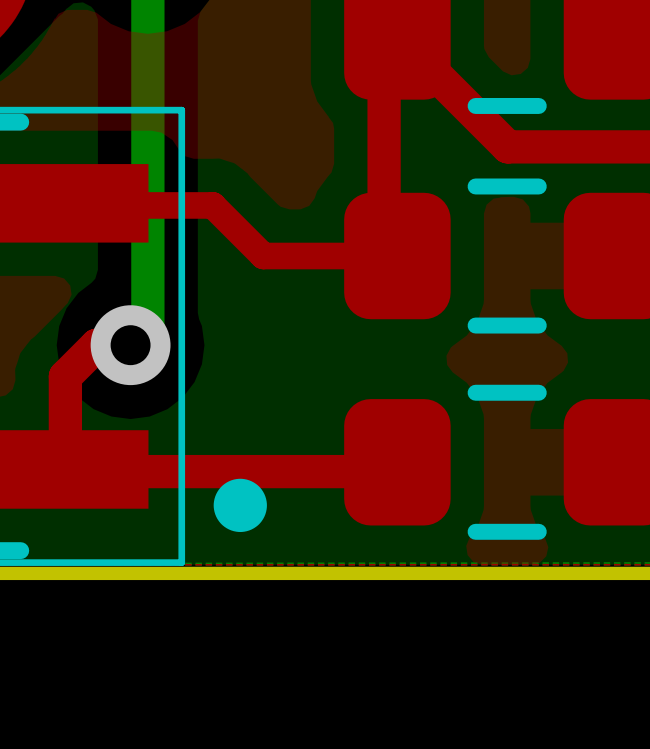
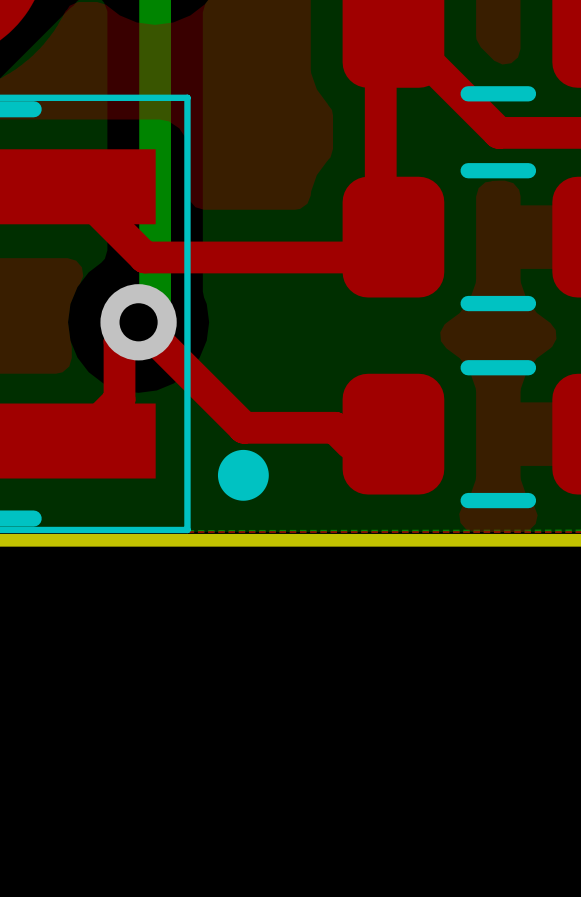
top track: (65, 205) (212, 205) (263, 256) (397, 256) -> (76, 188) (144, 257) (354, 257) (380, 230)
top track: (130, 345) (96, 345) (65, 376) (65, 471) (388, 471) -> none
top track: none -> (76, 443) (119, 399) (119, 341) (138, 322) (244, 427) (334, 427) (350, 443)

